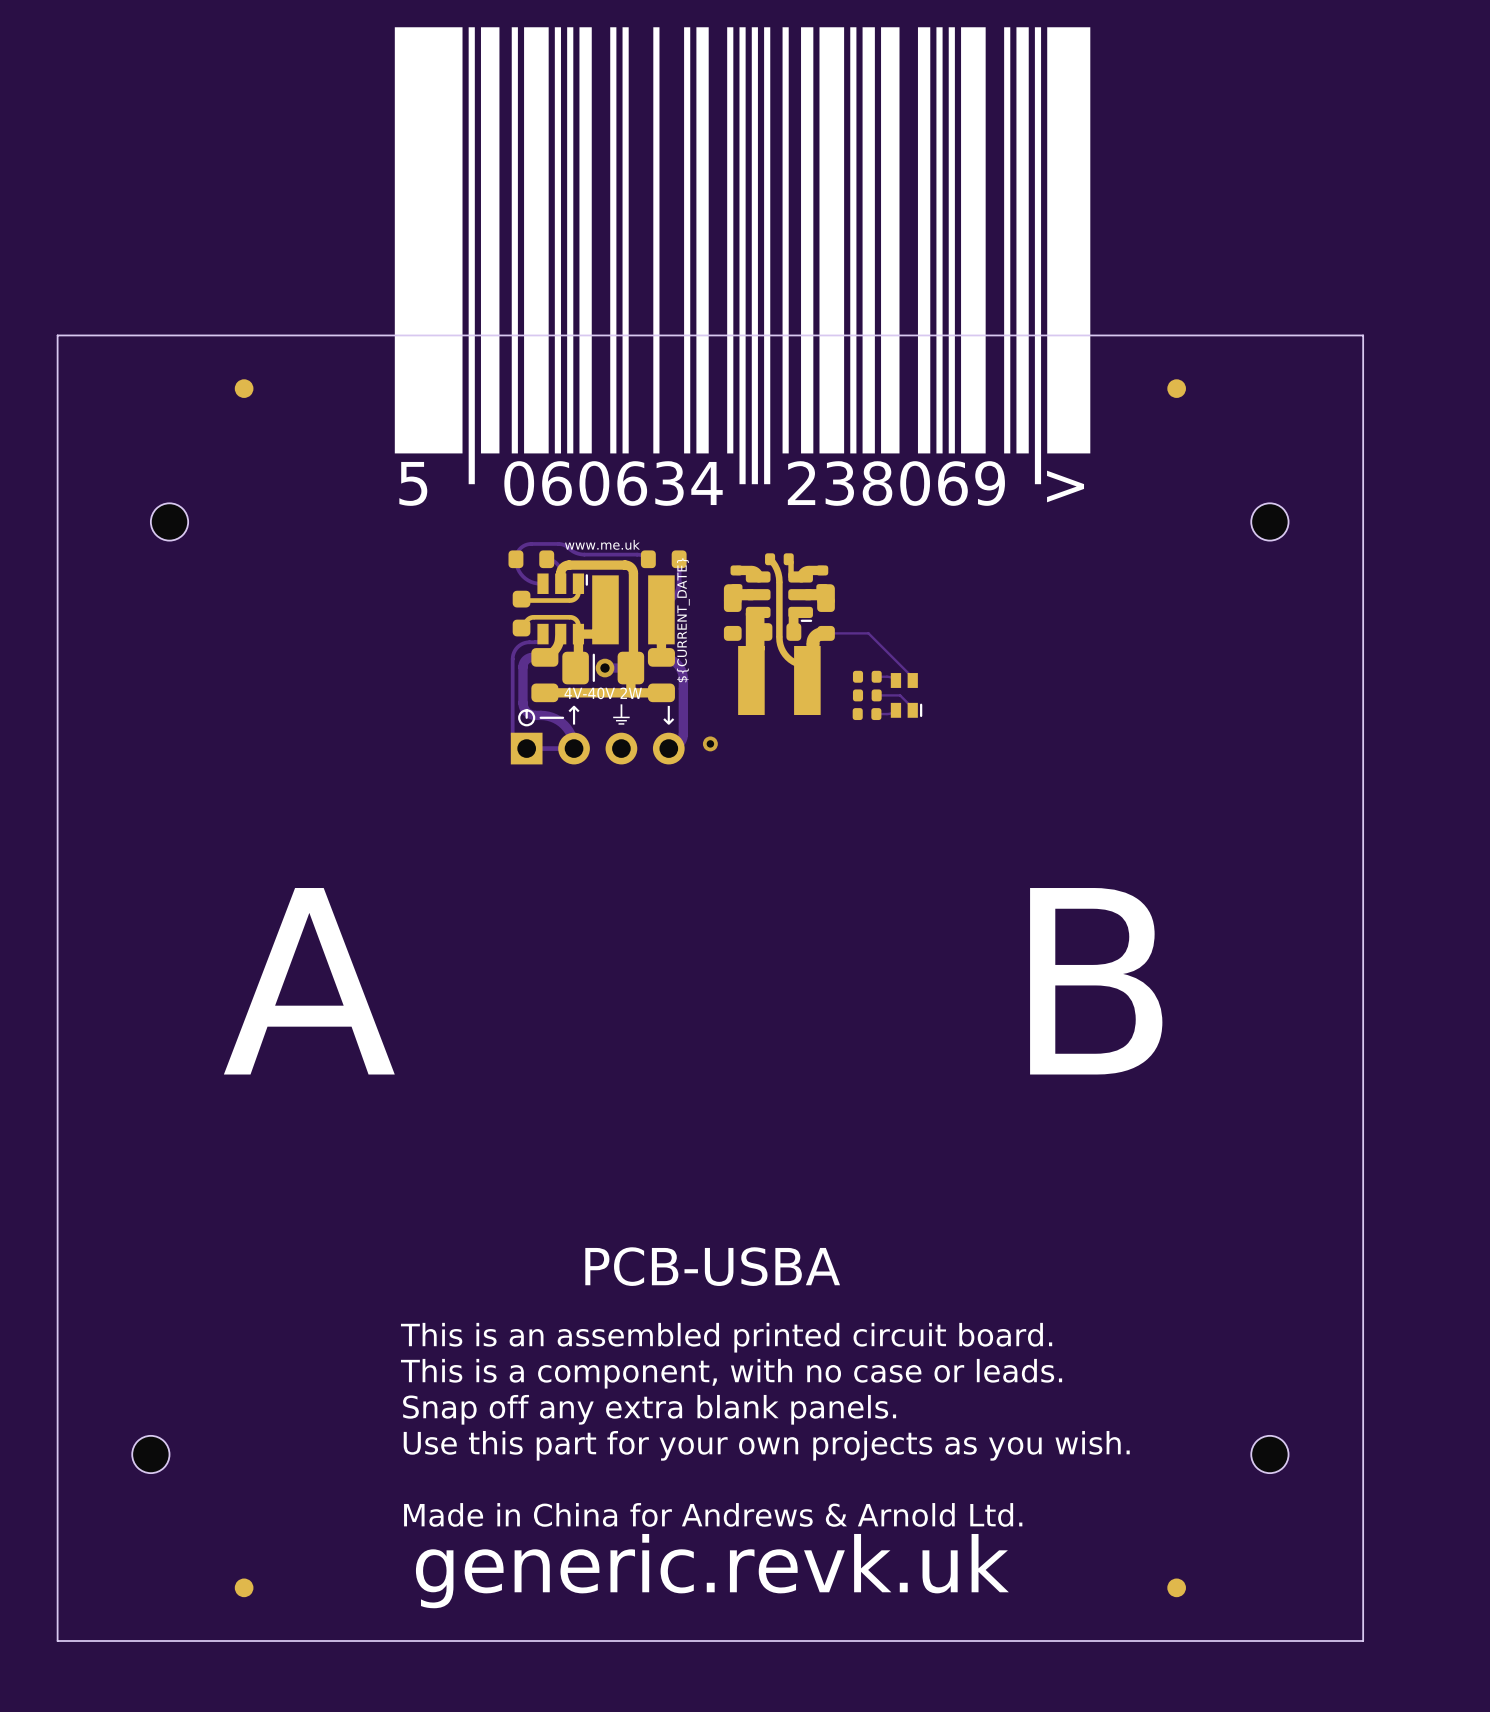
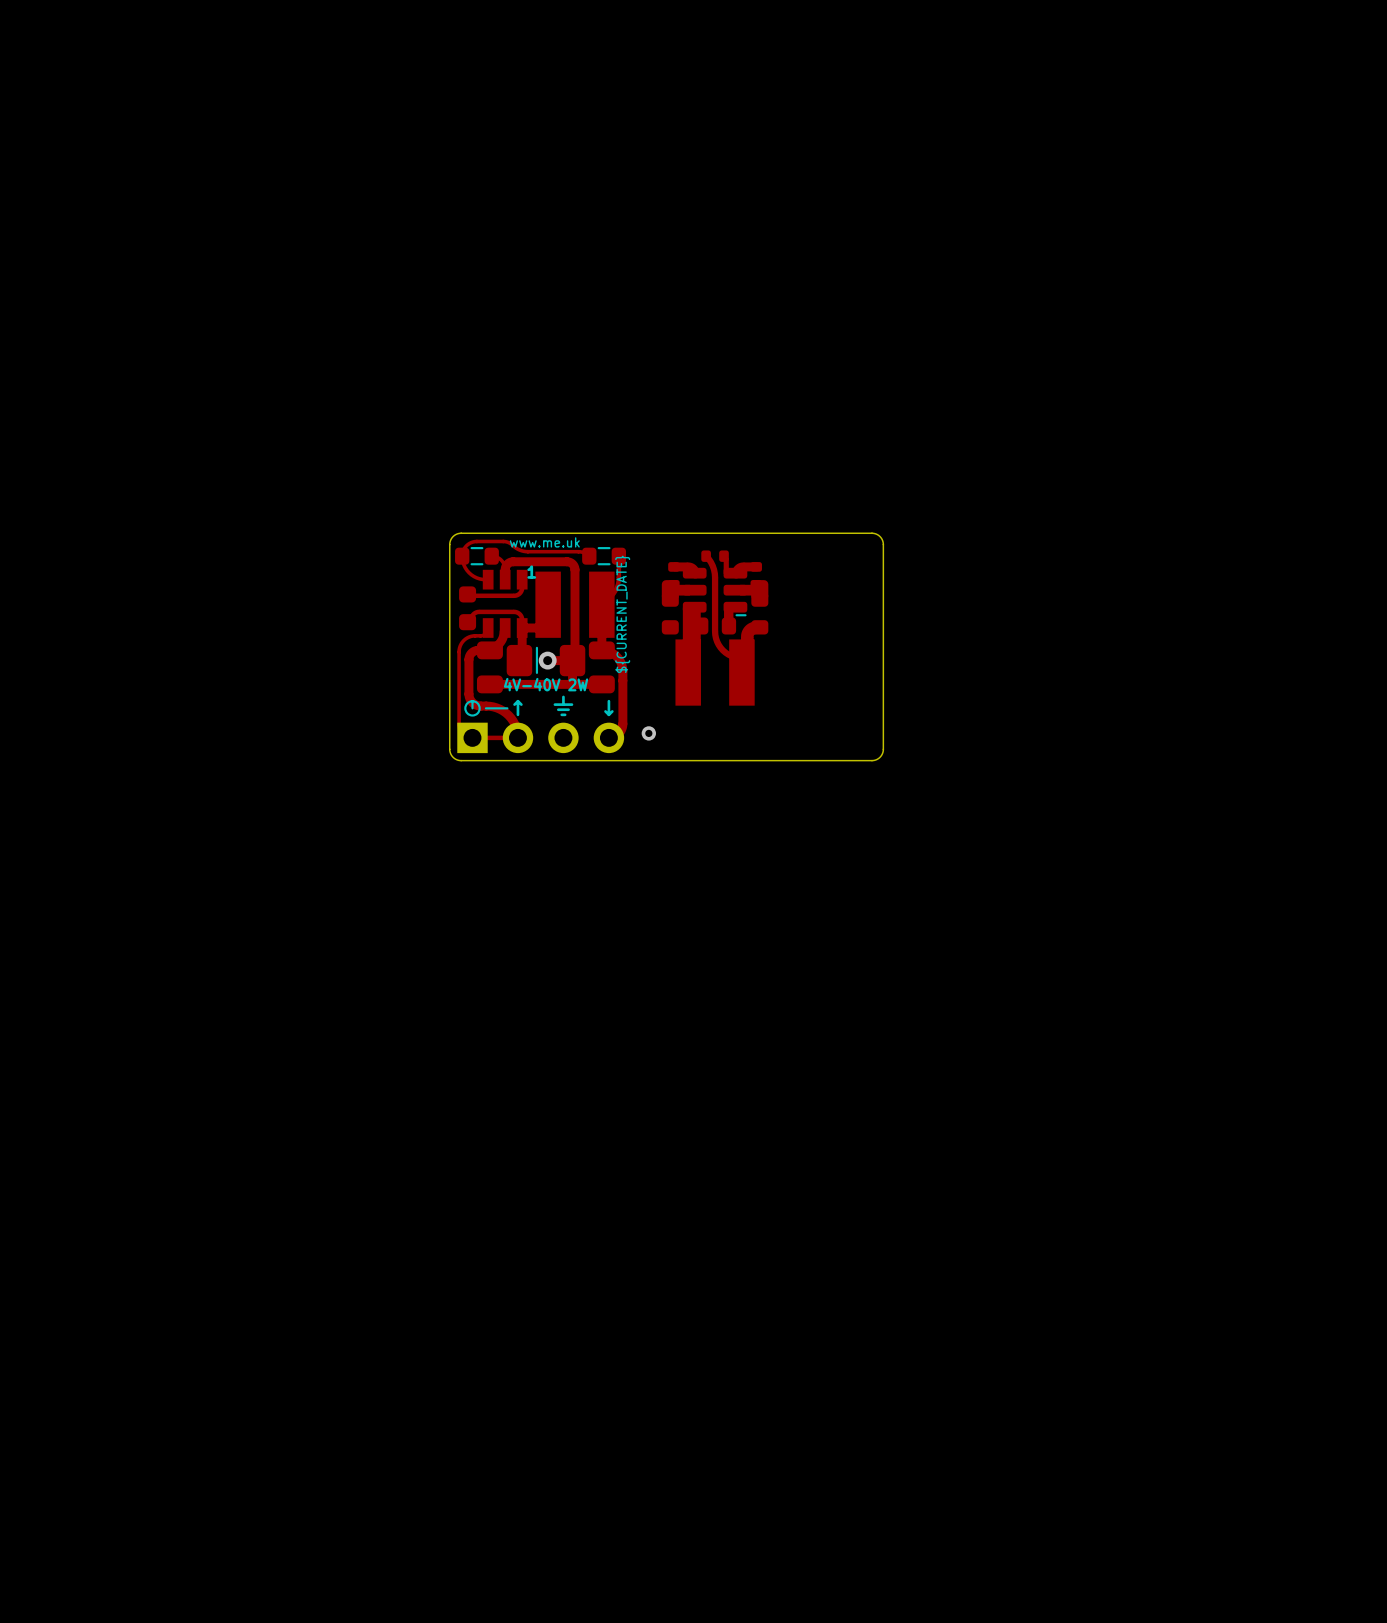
drawing: [394, 27, 1091, 485] -> none
board edge: (57, 335) (1363, 335) (1363, 1641) (57, 1641) (57, 335) -> none
part: (244, 388) -> none
part: (1176, 388) -> none
part: (169, 521) -> none
part: (1269, 521) -> none
board edge: none -> (461, 533) (876, 534) (881, 538) (883, 544) (882, 754) (878, 758) (871, 760) (456, 759) (451, 755) (449, 749) (449, 544) (453, 536) (461, 533)
part footprint: [508, 550, 555, 569] -> [455, 547, 499, 566]
part footprint: [640, 550, 687, 569] -> [582, 547, 627, 566]
part footprint: [512, 560, 675, 703] -> [459, 557, 615, 694]
track: (826, 633) (868, 633) (910, 675) (912, 680) -> none
part: (867, 676) -> none
track: (876, 676) (889, 677) (895, 680) -> none
part: (867, 695) -> none
track: (876, 695) (900, 695) (912, 708) (912, 710) -> none
part: (906, 695) -> none
track: (895, 710) (889, 713) (876, 714) -> none
part: (867, 714) -> none
text: A (309, 981) -> none
text: B (1096, 981) -> none
text: PCB-USBA (712, 1266) -> none
text: This is an assembled printed circuit board. (726, 1337) -> none
text: This is a component, with no case or leads. (731, 1373) -> none
text: Snap off any extra blank panels. (649, 1409) -> none
text: Use this part for your own projects as you wish. (766, 1445) -> none
part: (150, 1454) -> none
part: (1269, 1454) -> none
text: Made in China for Andrews & Arnold Ltd. (713, 1514) -> none
text: generic.revk.uk (712, 1571) -> none
part: (244, 1587) -> none
part: (1176, 1587) -> none

